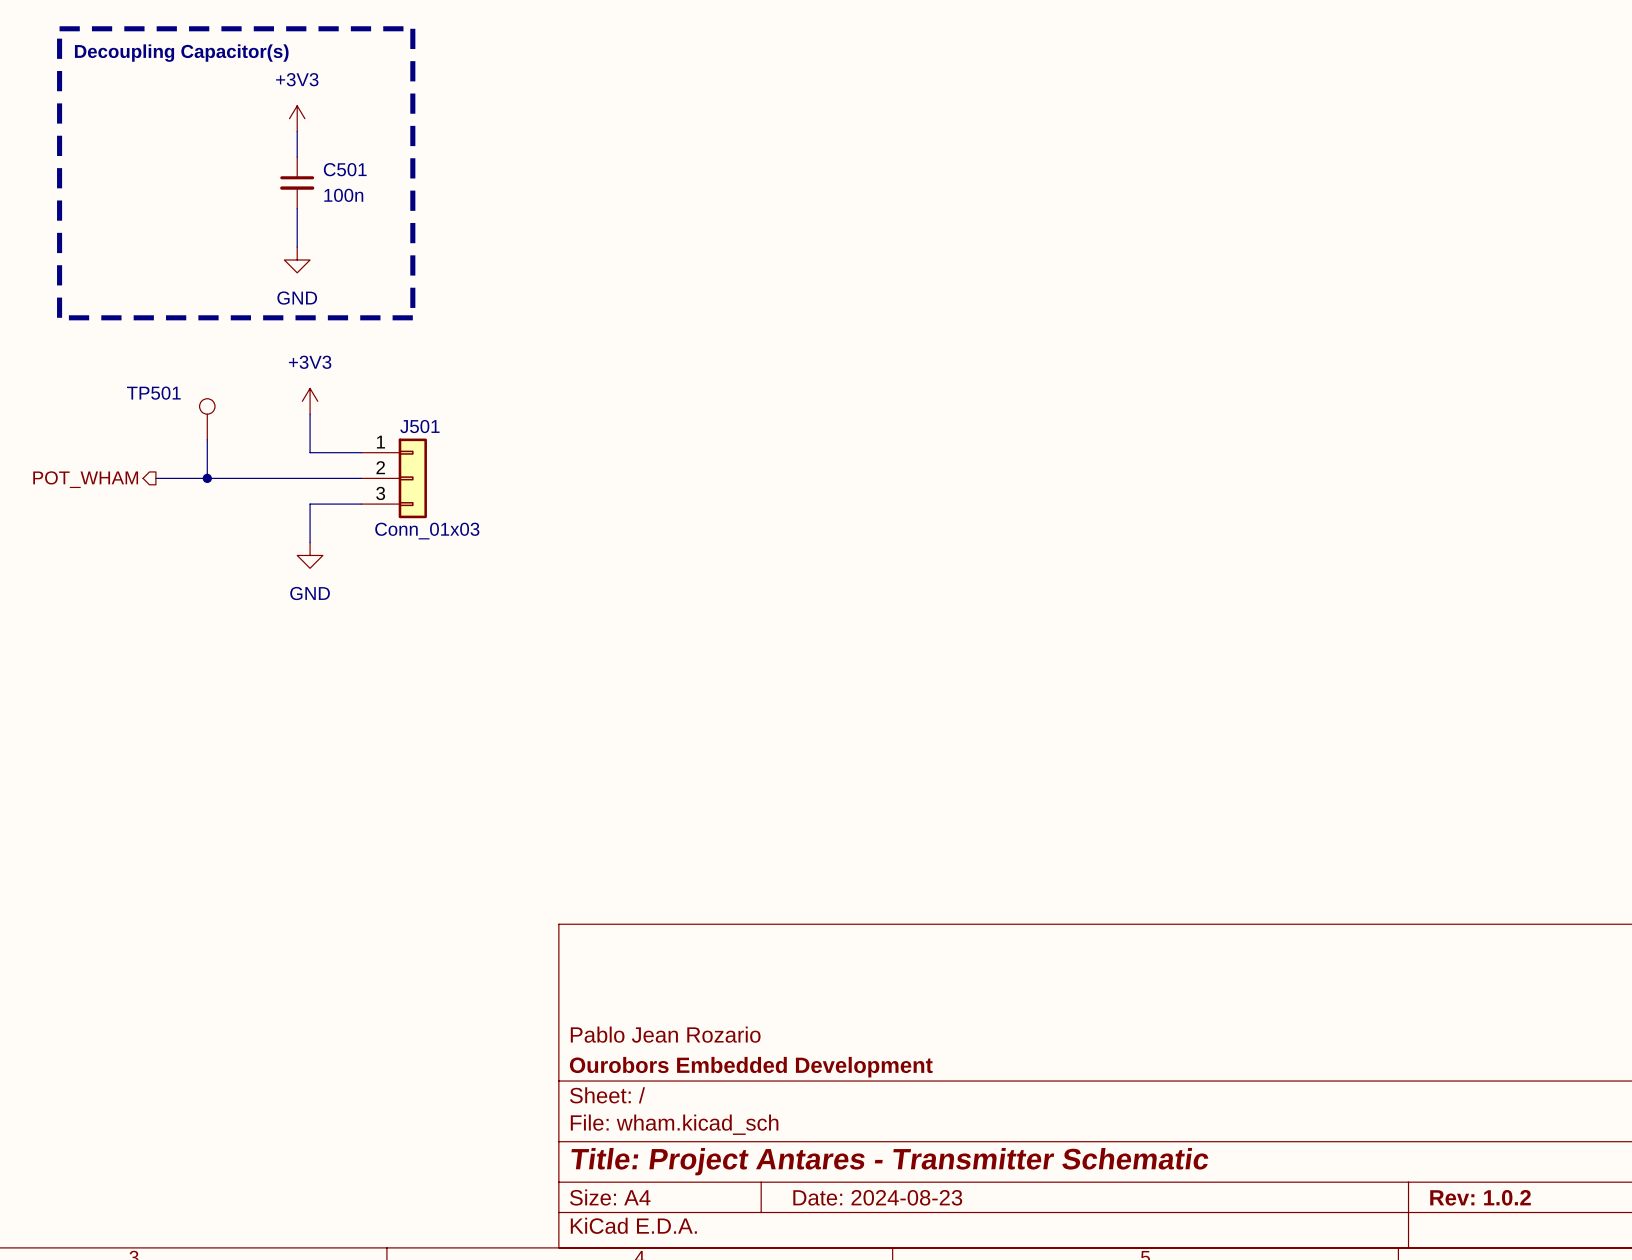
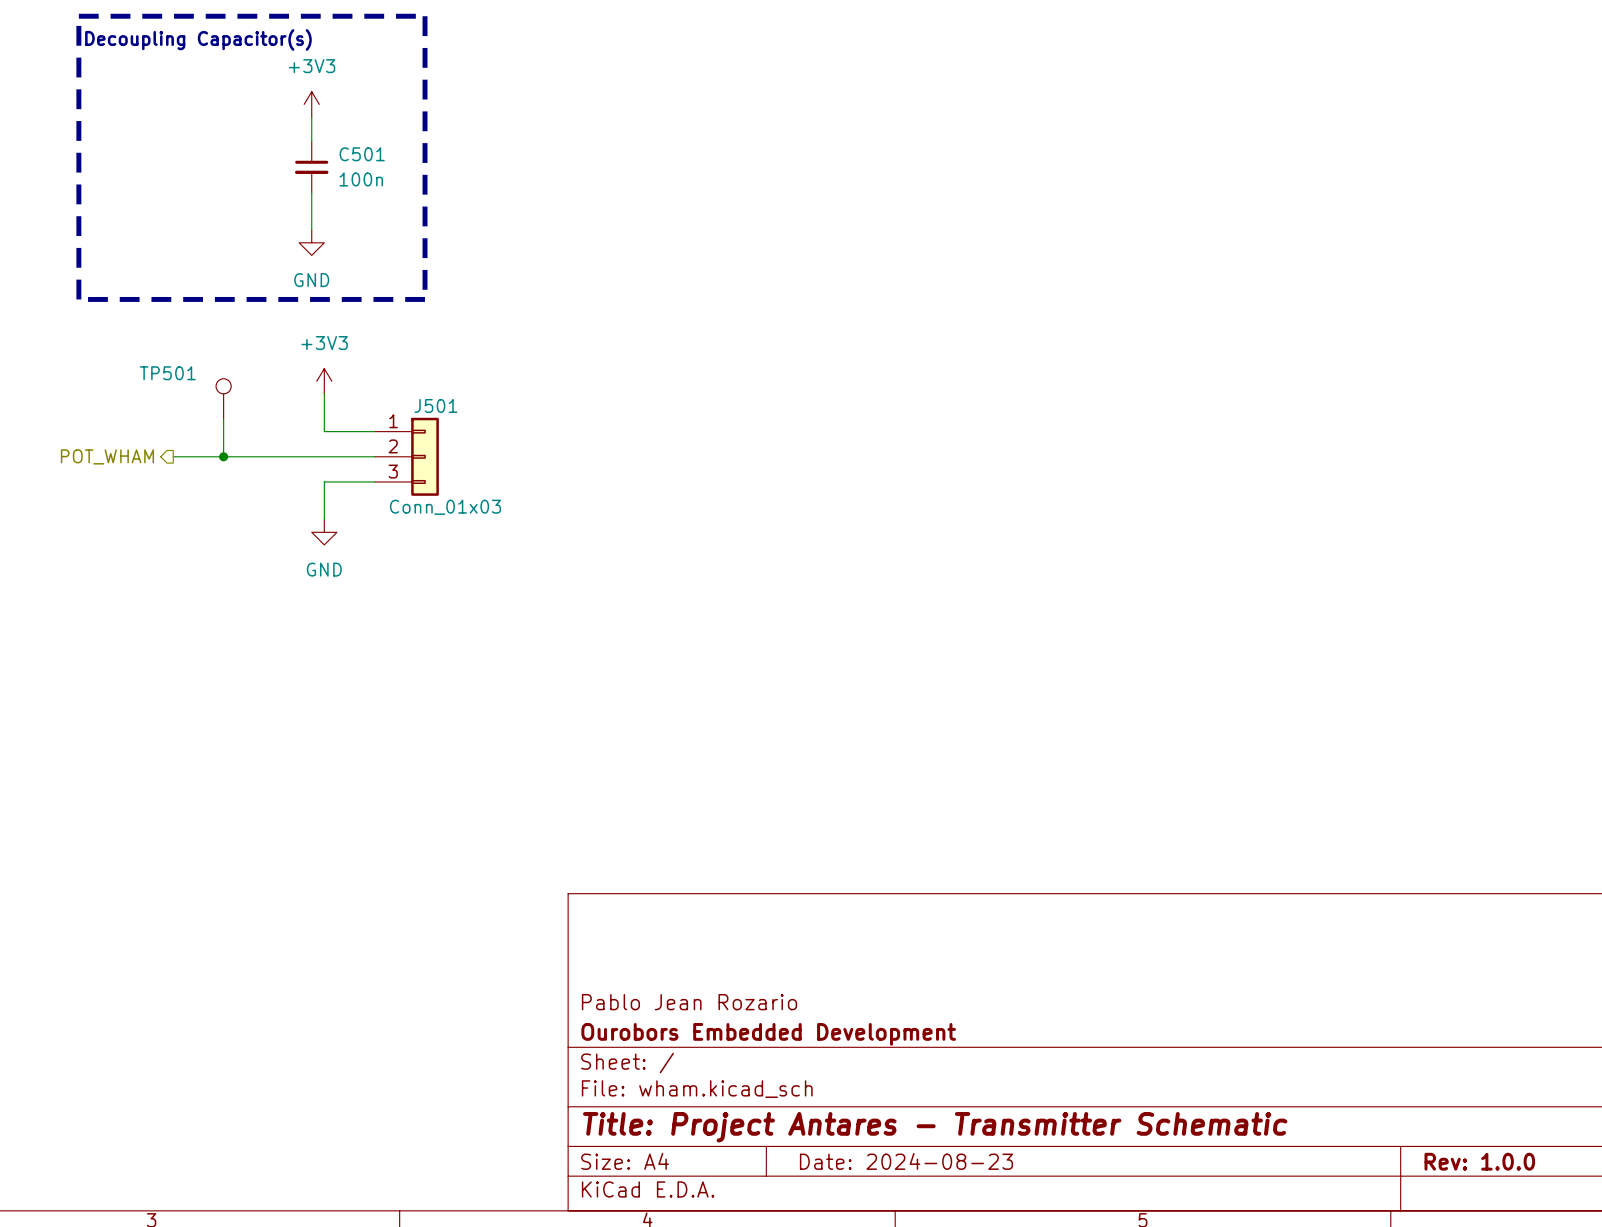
title block: Rev: 1.0.2 (1480, 1197) -> Rev: 1.0.0 (1479, 1161)

